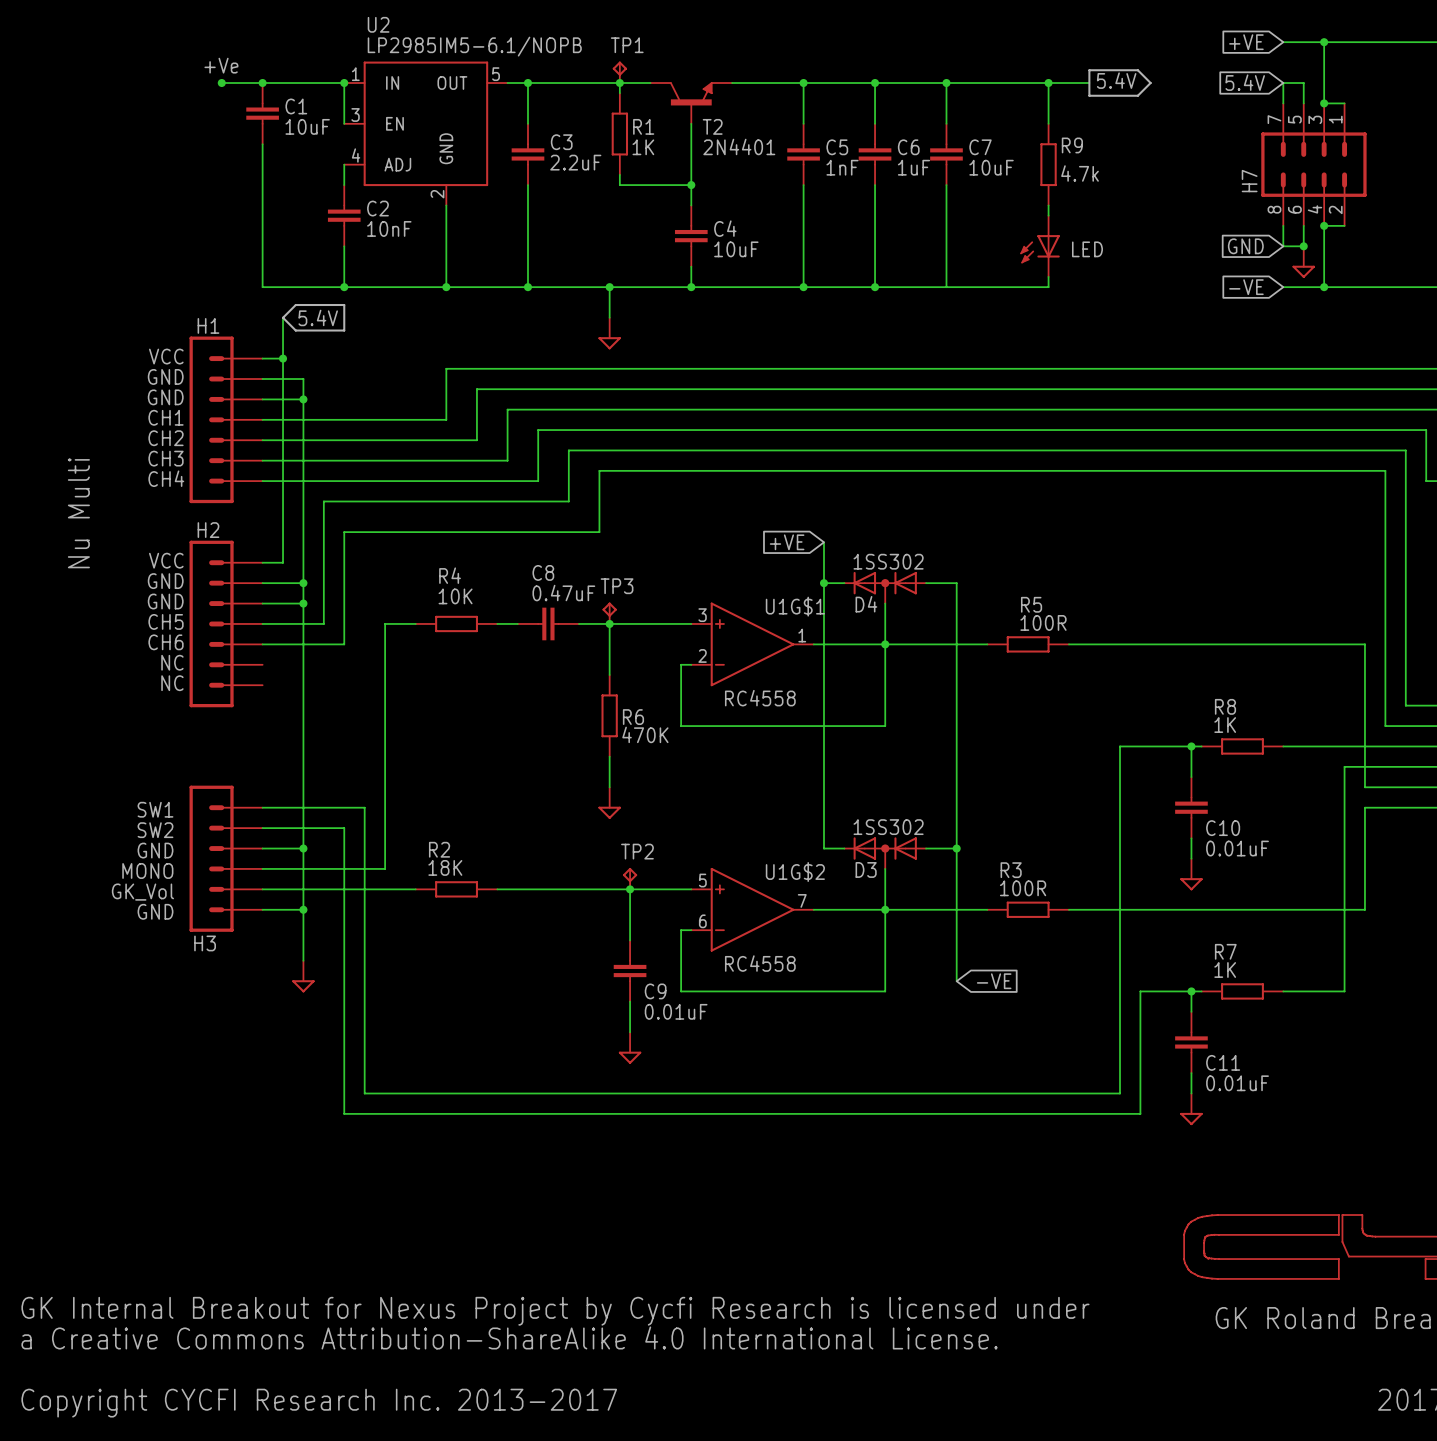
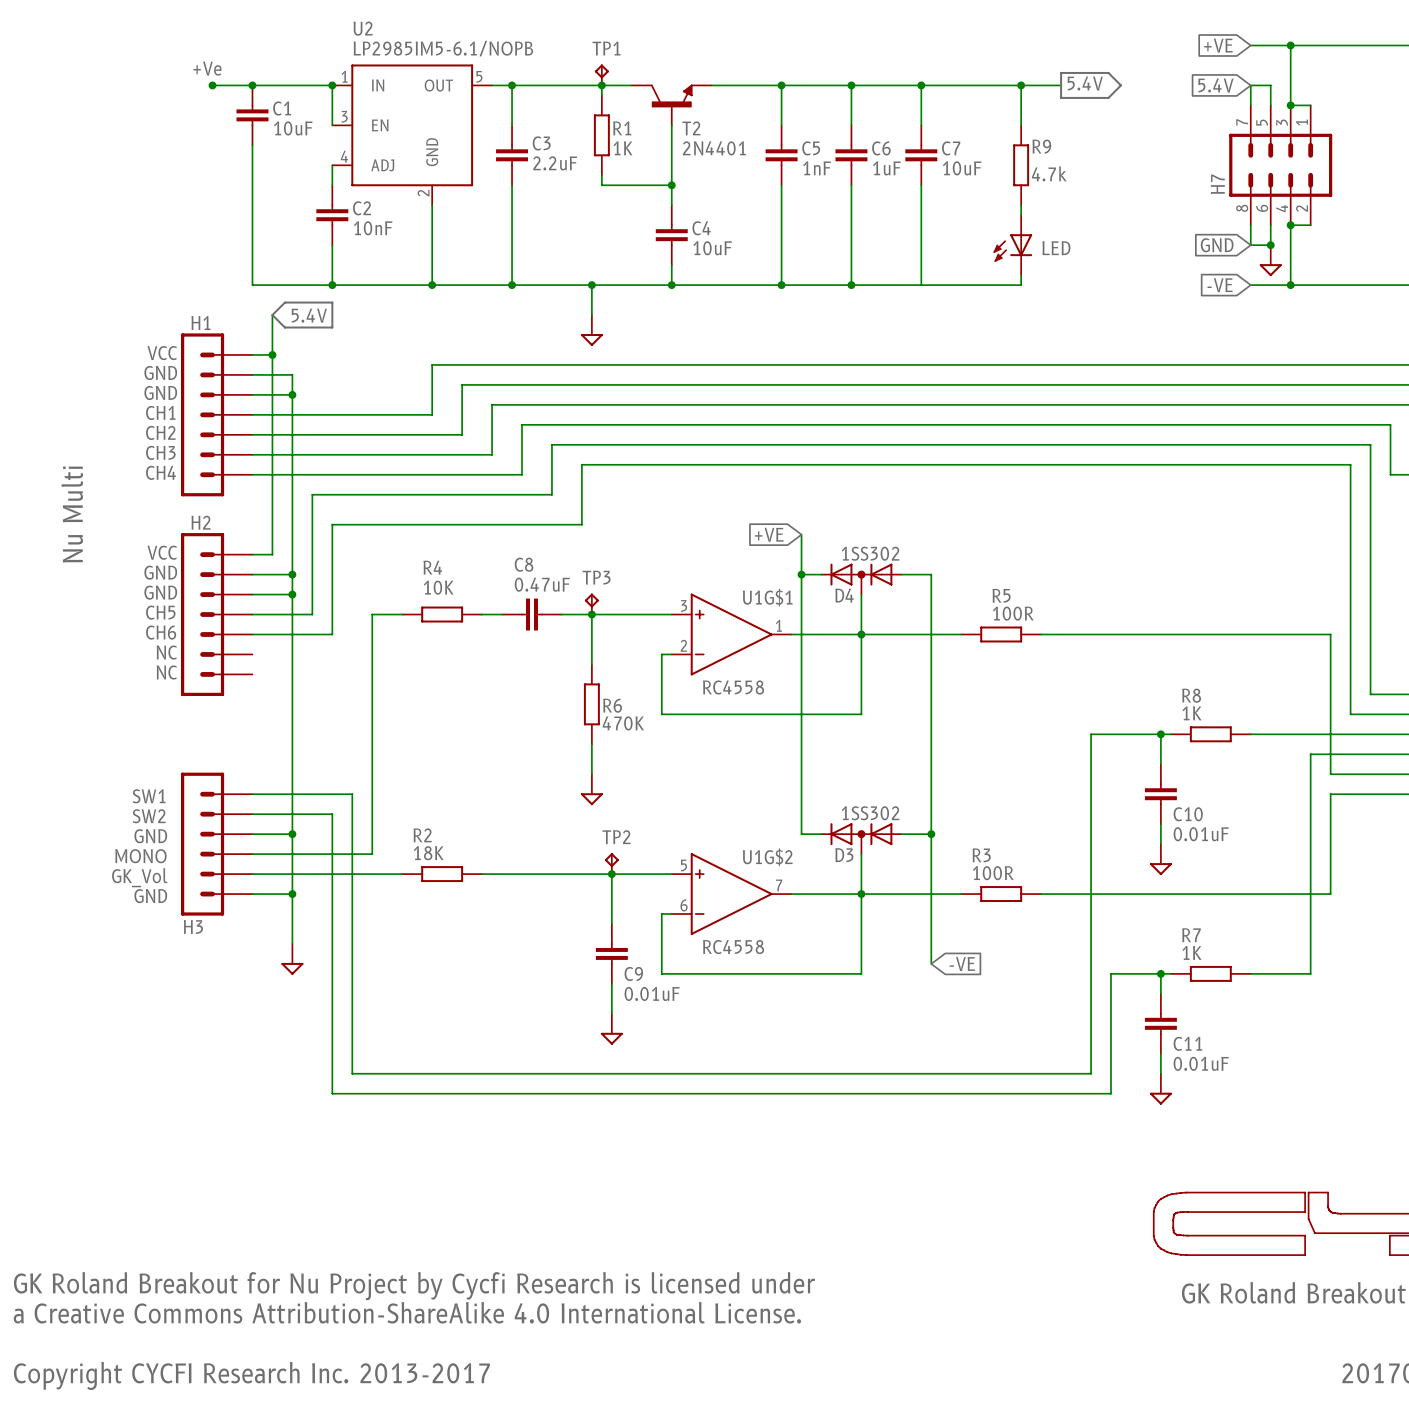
text: GK Internal Breakout for Nexus Project by Cycfi Research is licensed under (555, 1311) -> GK Roland Breakout for Nu Project by Cycfi Research is licensed under (414, 1286)

